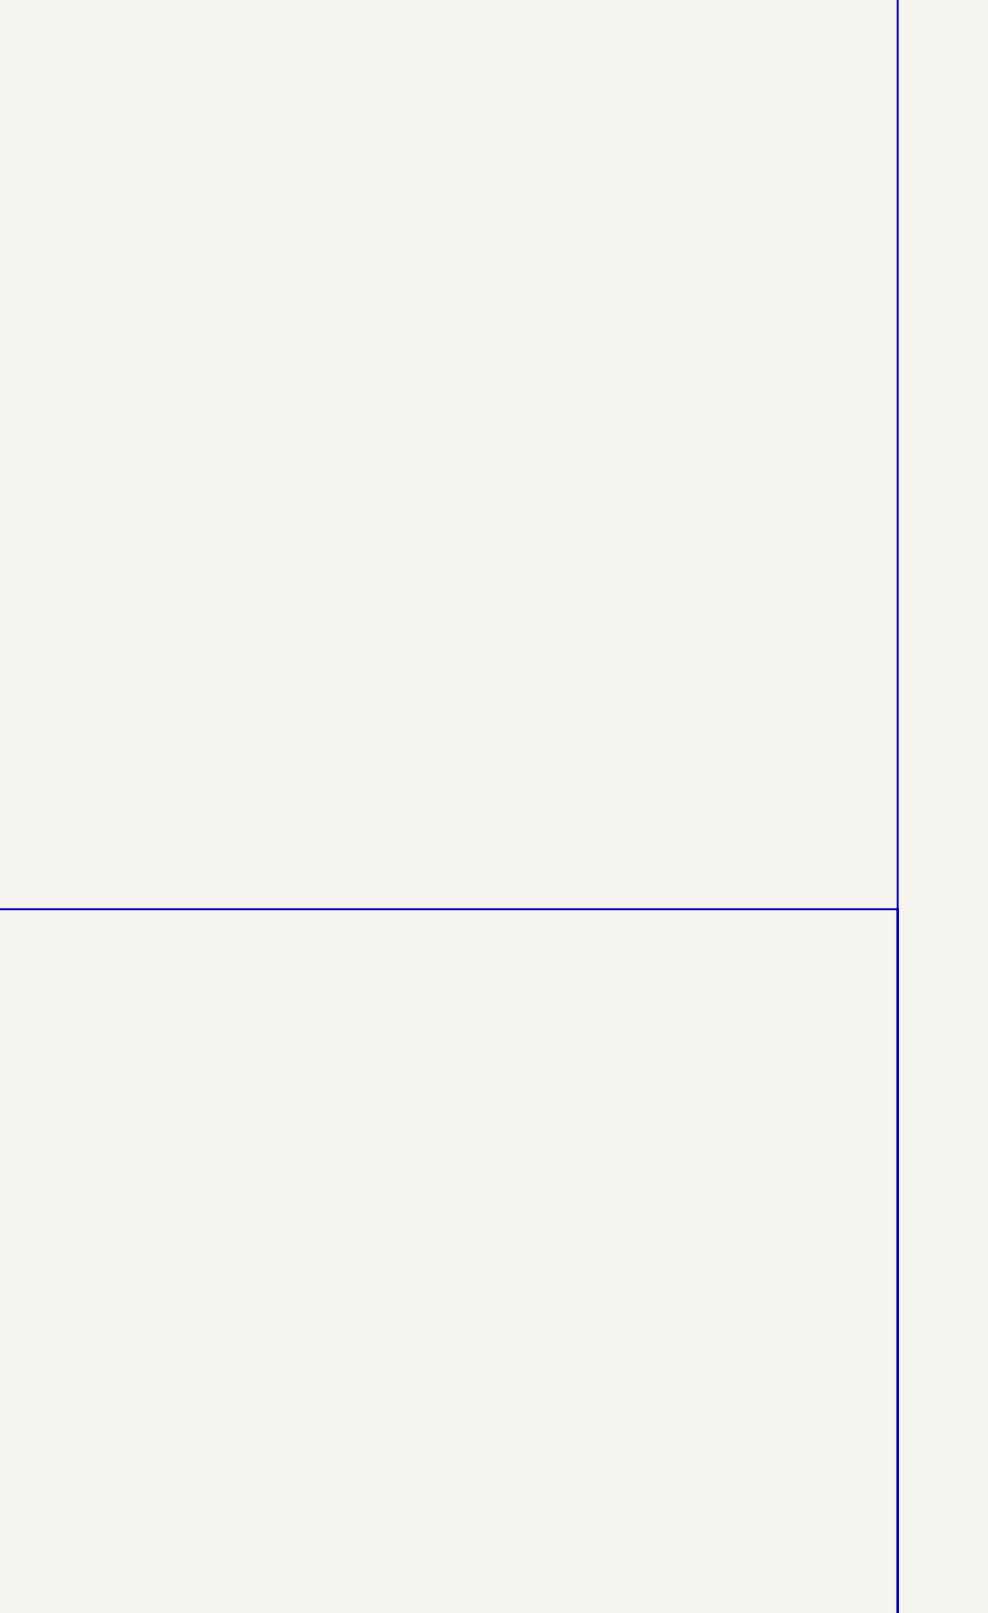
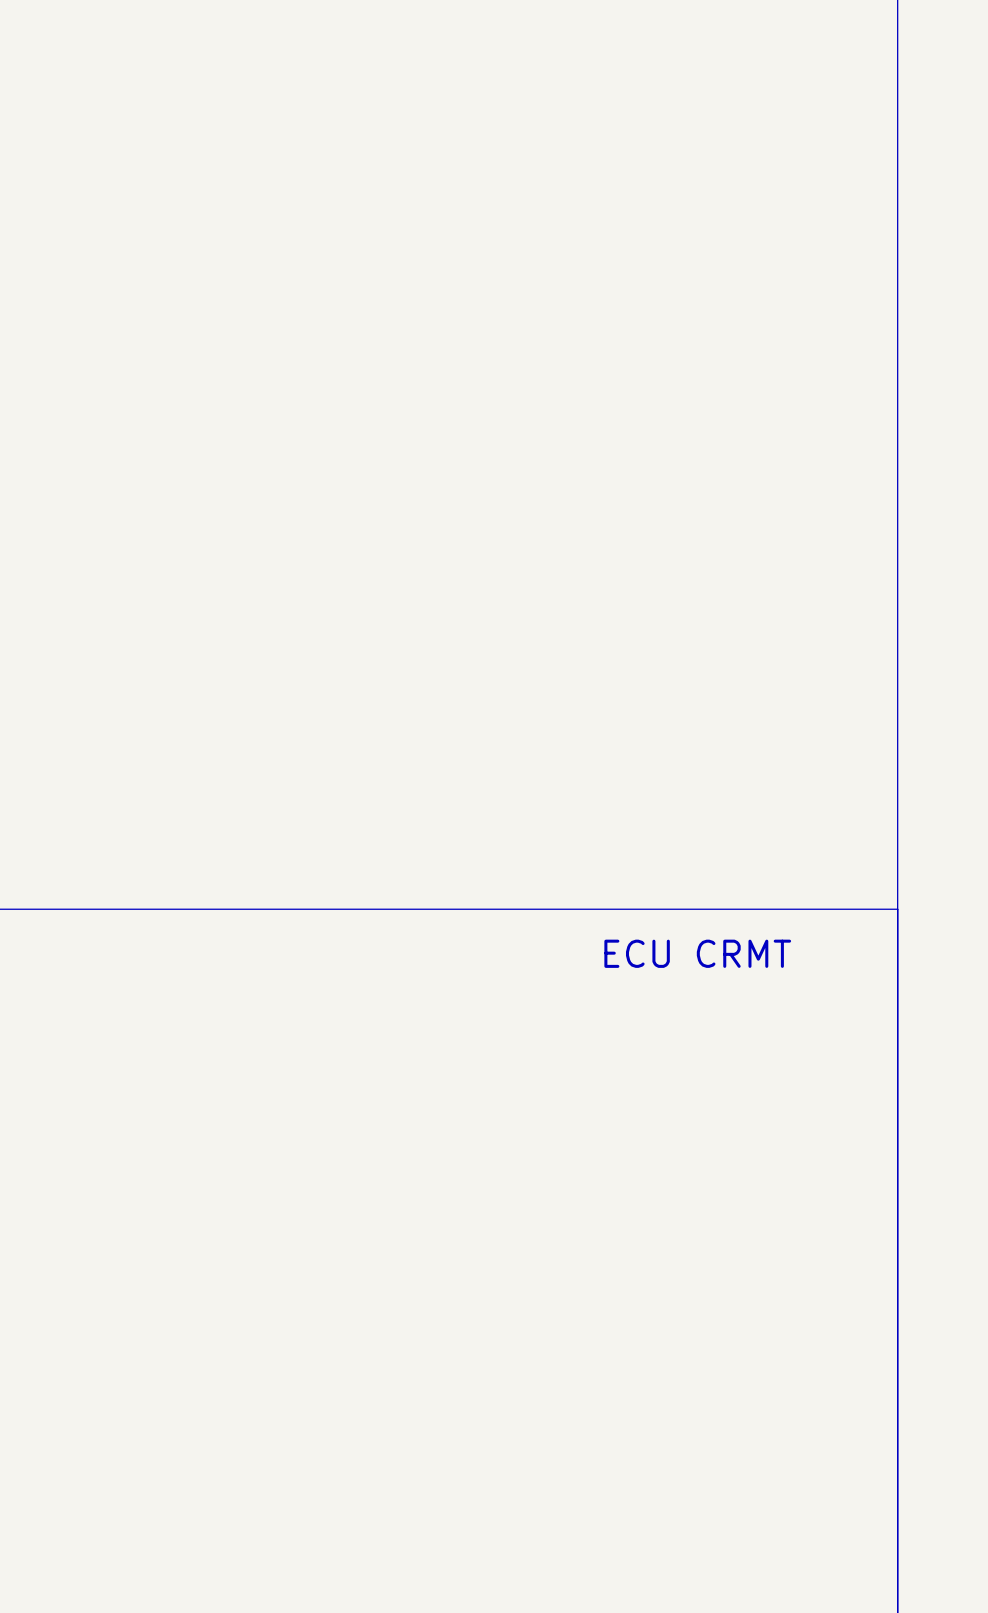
text: none -> ECU CRMT (697, 953)

